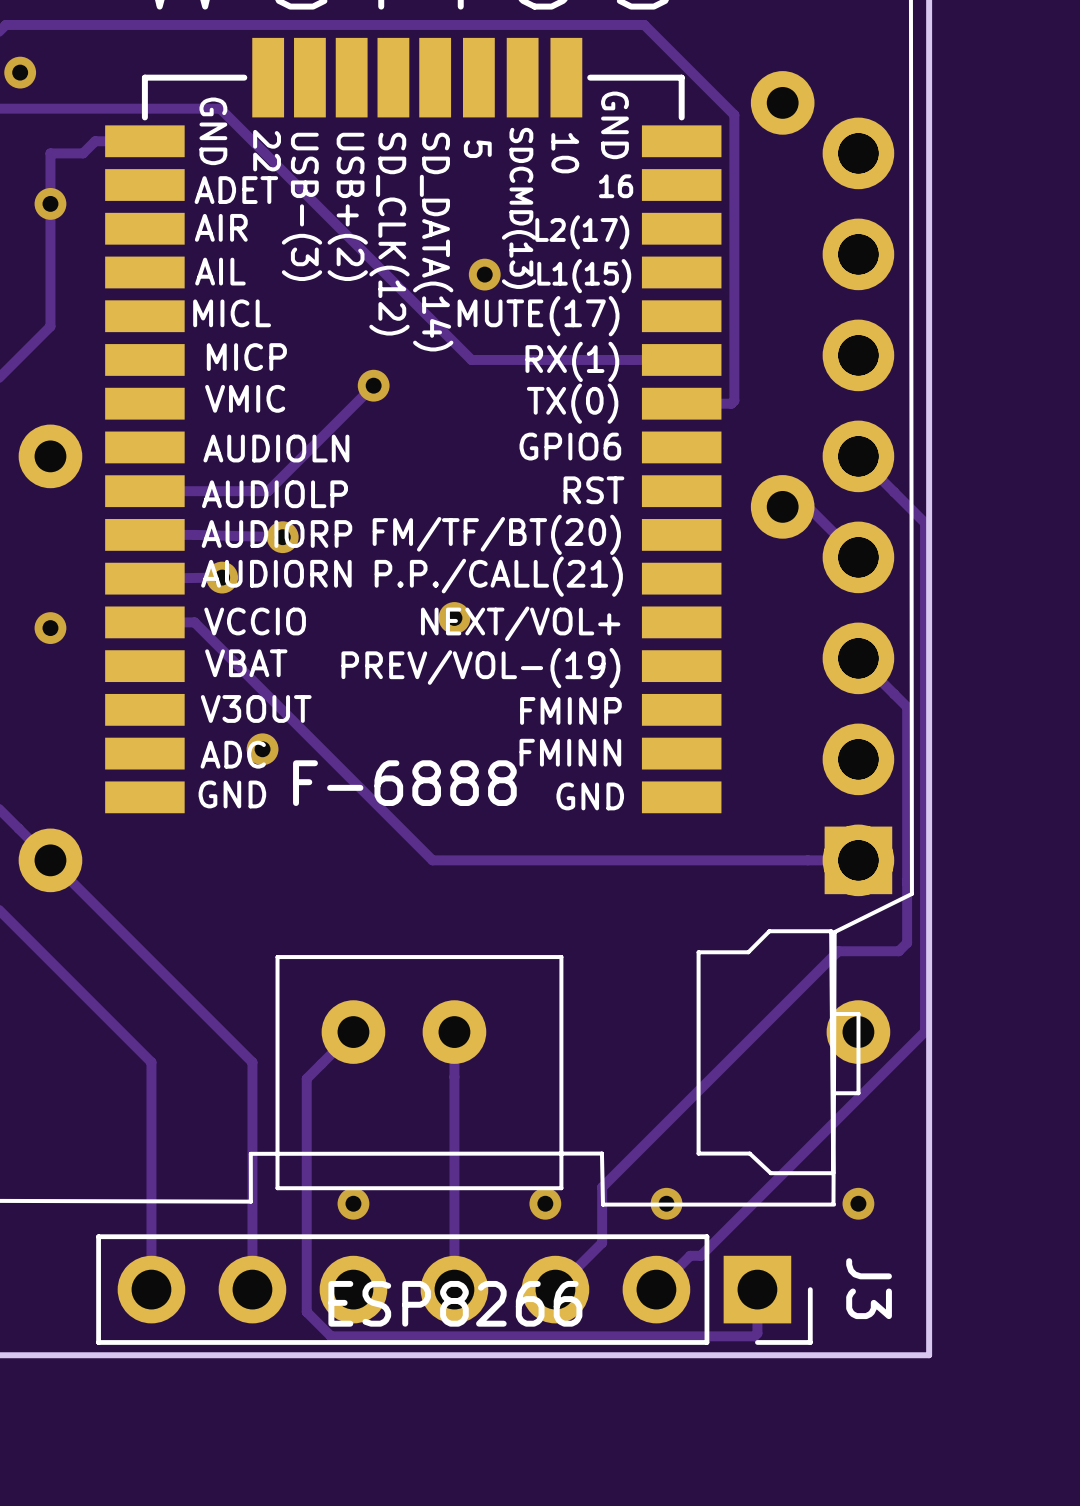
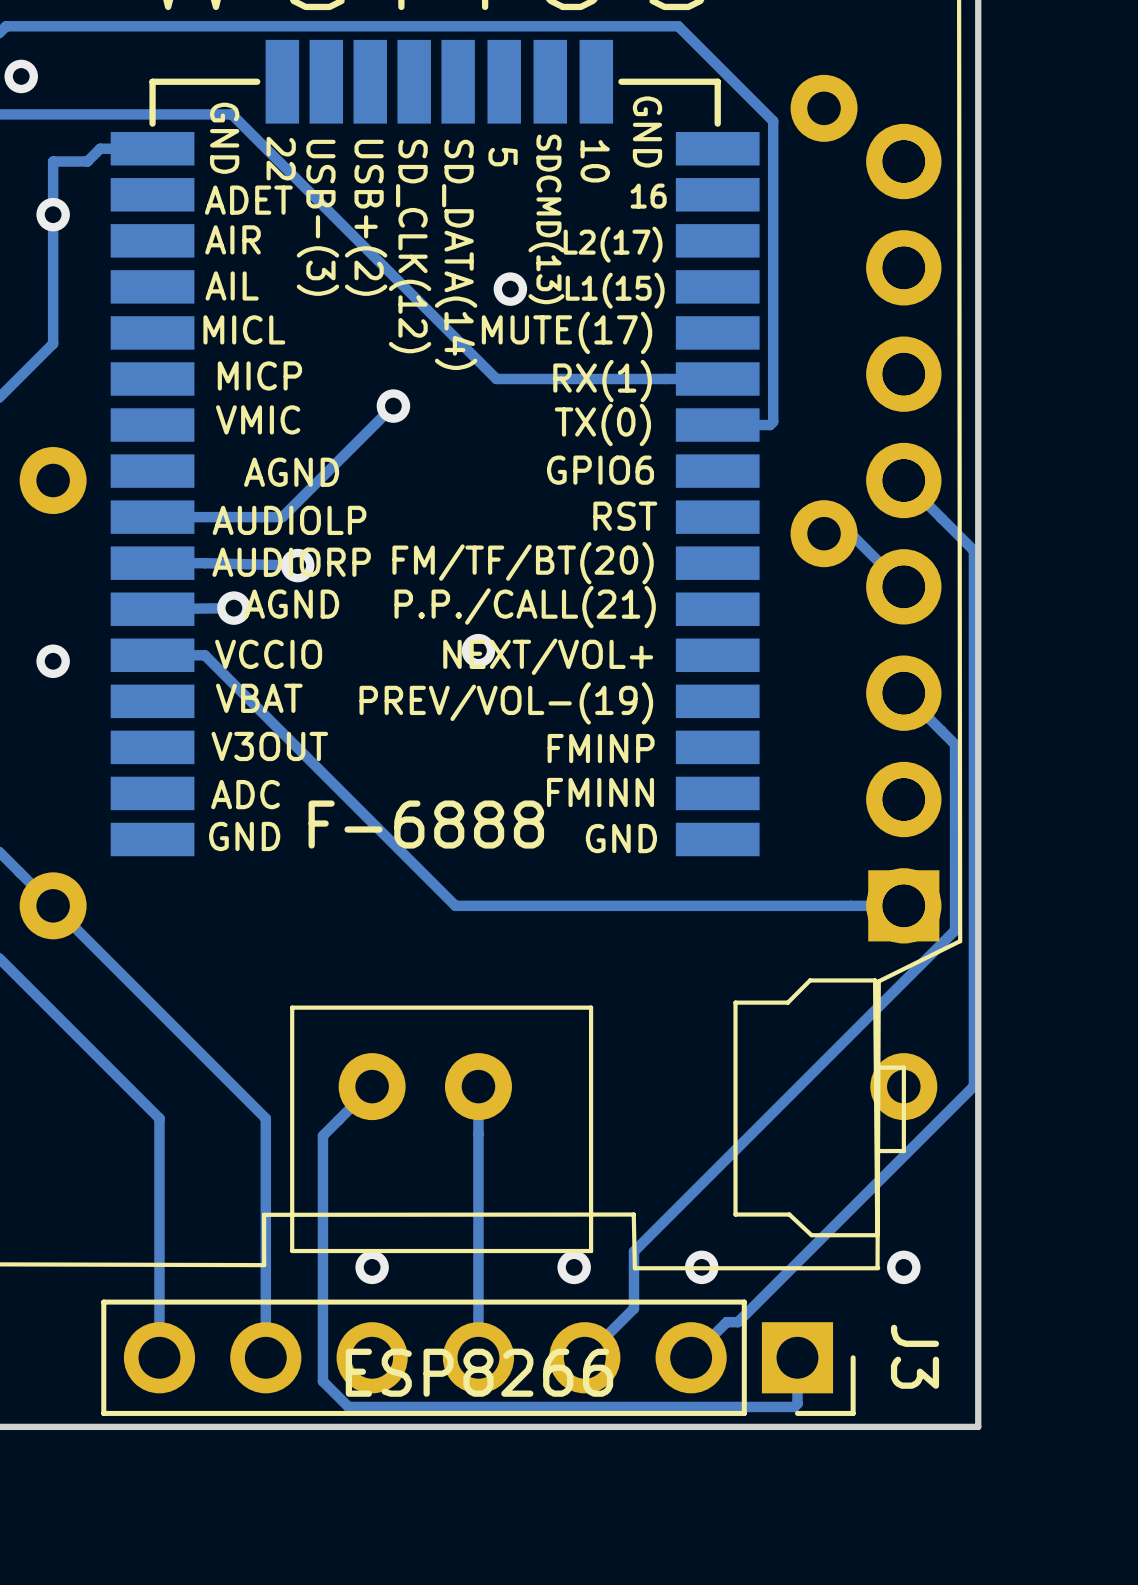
part text: AUDIOLN (276, 448) -> AGND (291, 472)
part text: AUDIORN (276, 573) -> AGND (291, 604)
via: (262, 749) -> none
track: (907, 883) (907, 942) (898, 951) (838, 951) (602, 1188) -> (955, 930) (633, 1251)

